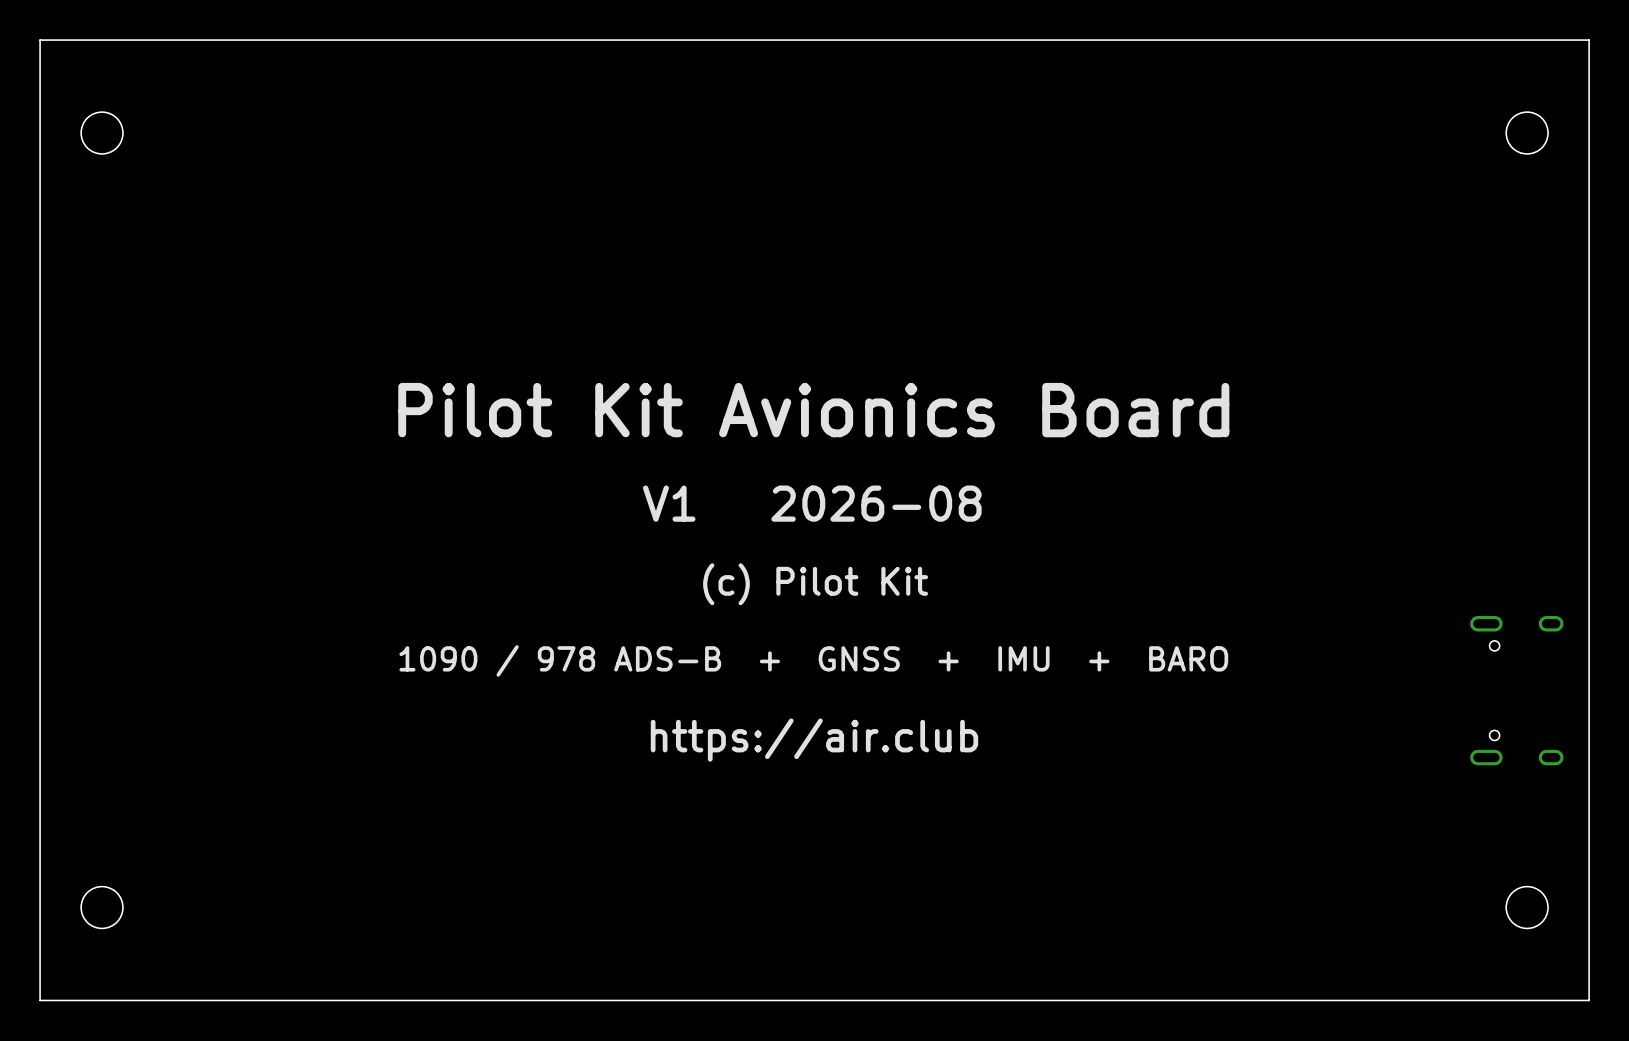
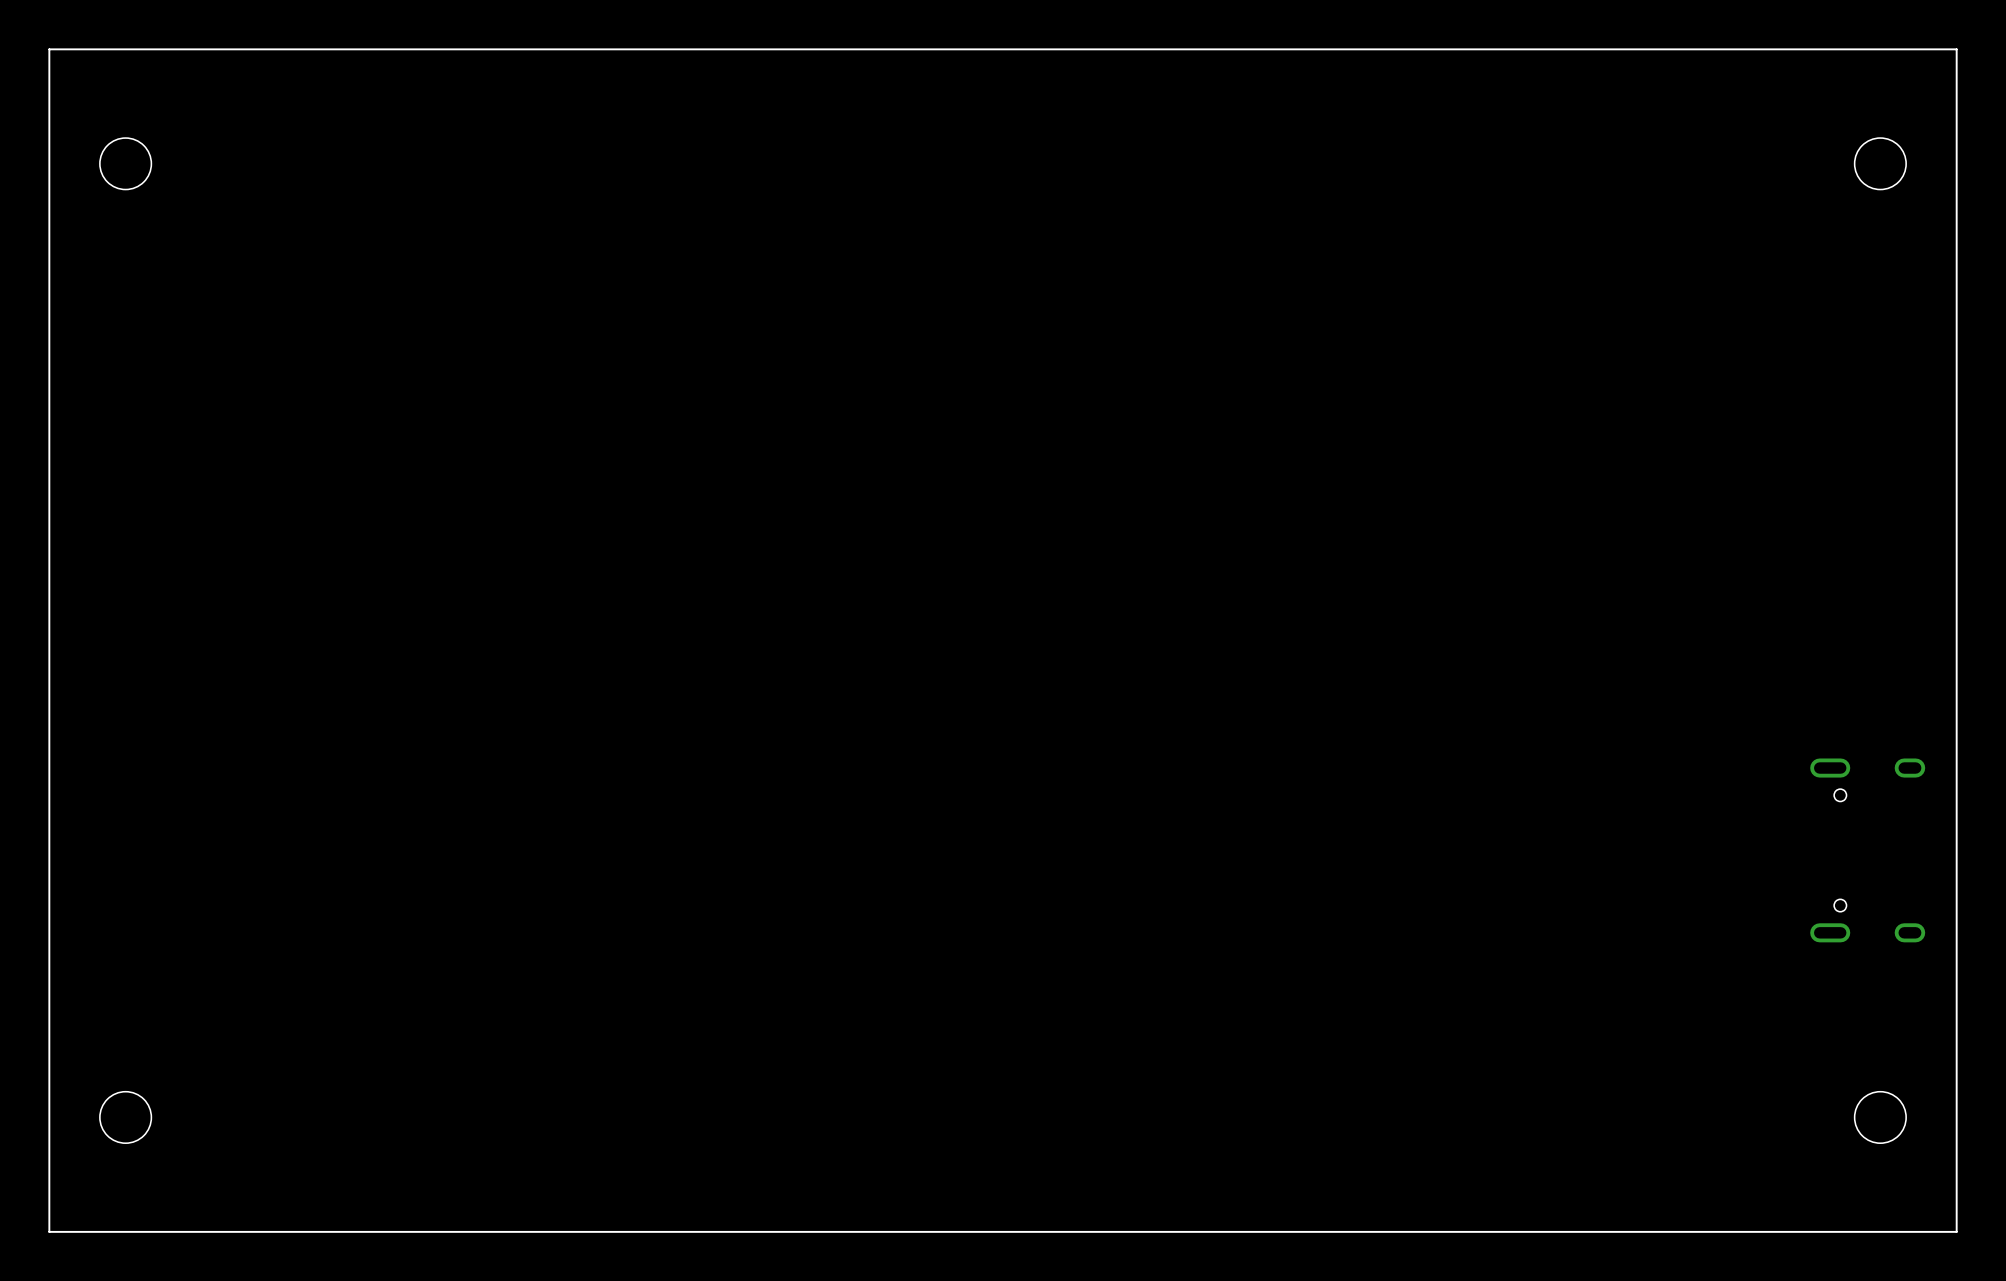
text: Pilot Kit Avionics Board (813, 410) -> none
text: V1 2026-08 (812, 503) -> none
text: (c) Pilot Kit (815, 584) -> none
text: 1090 / 978 ADS-B + GNSS + IMU + BARO (813, 660) -> none
text: https://air.club (814, 740) -> none

